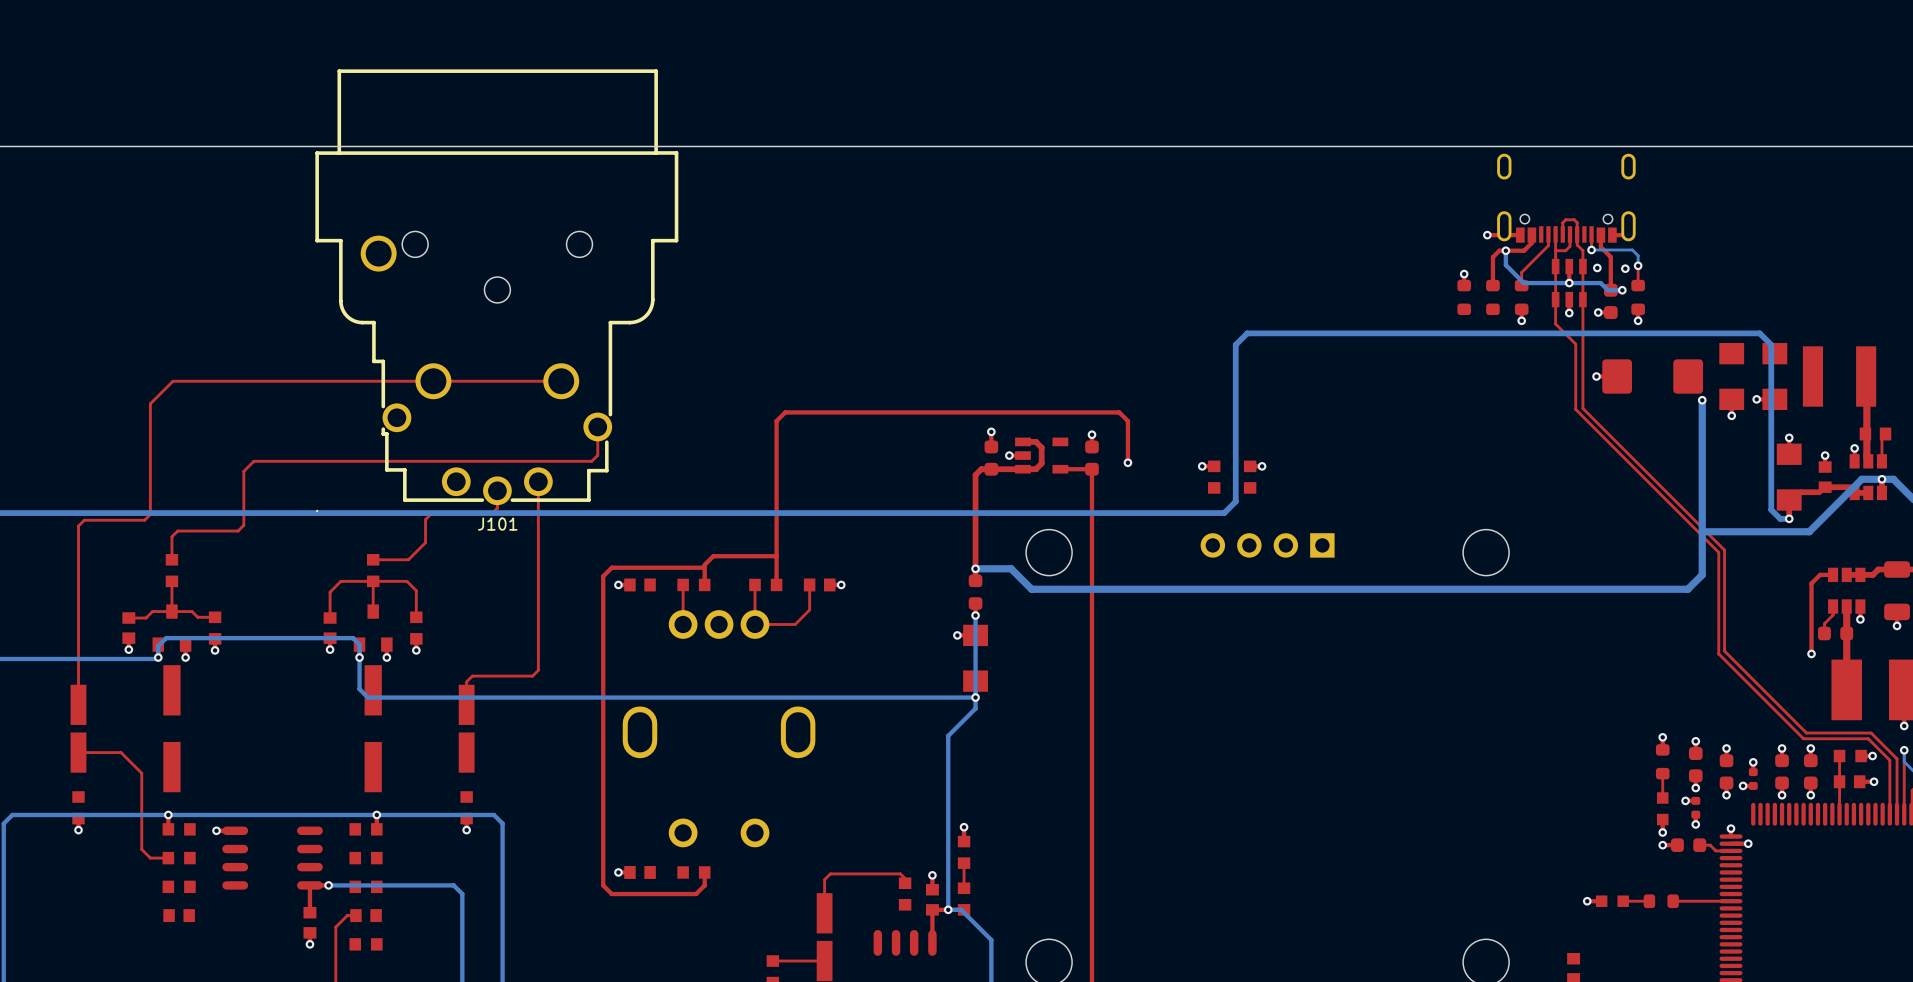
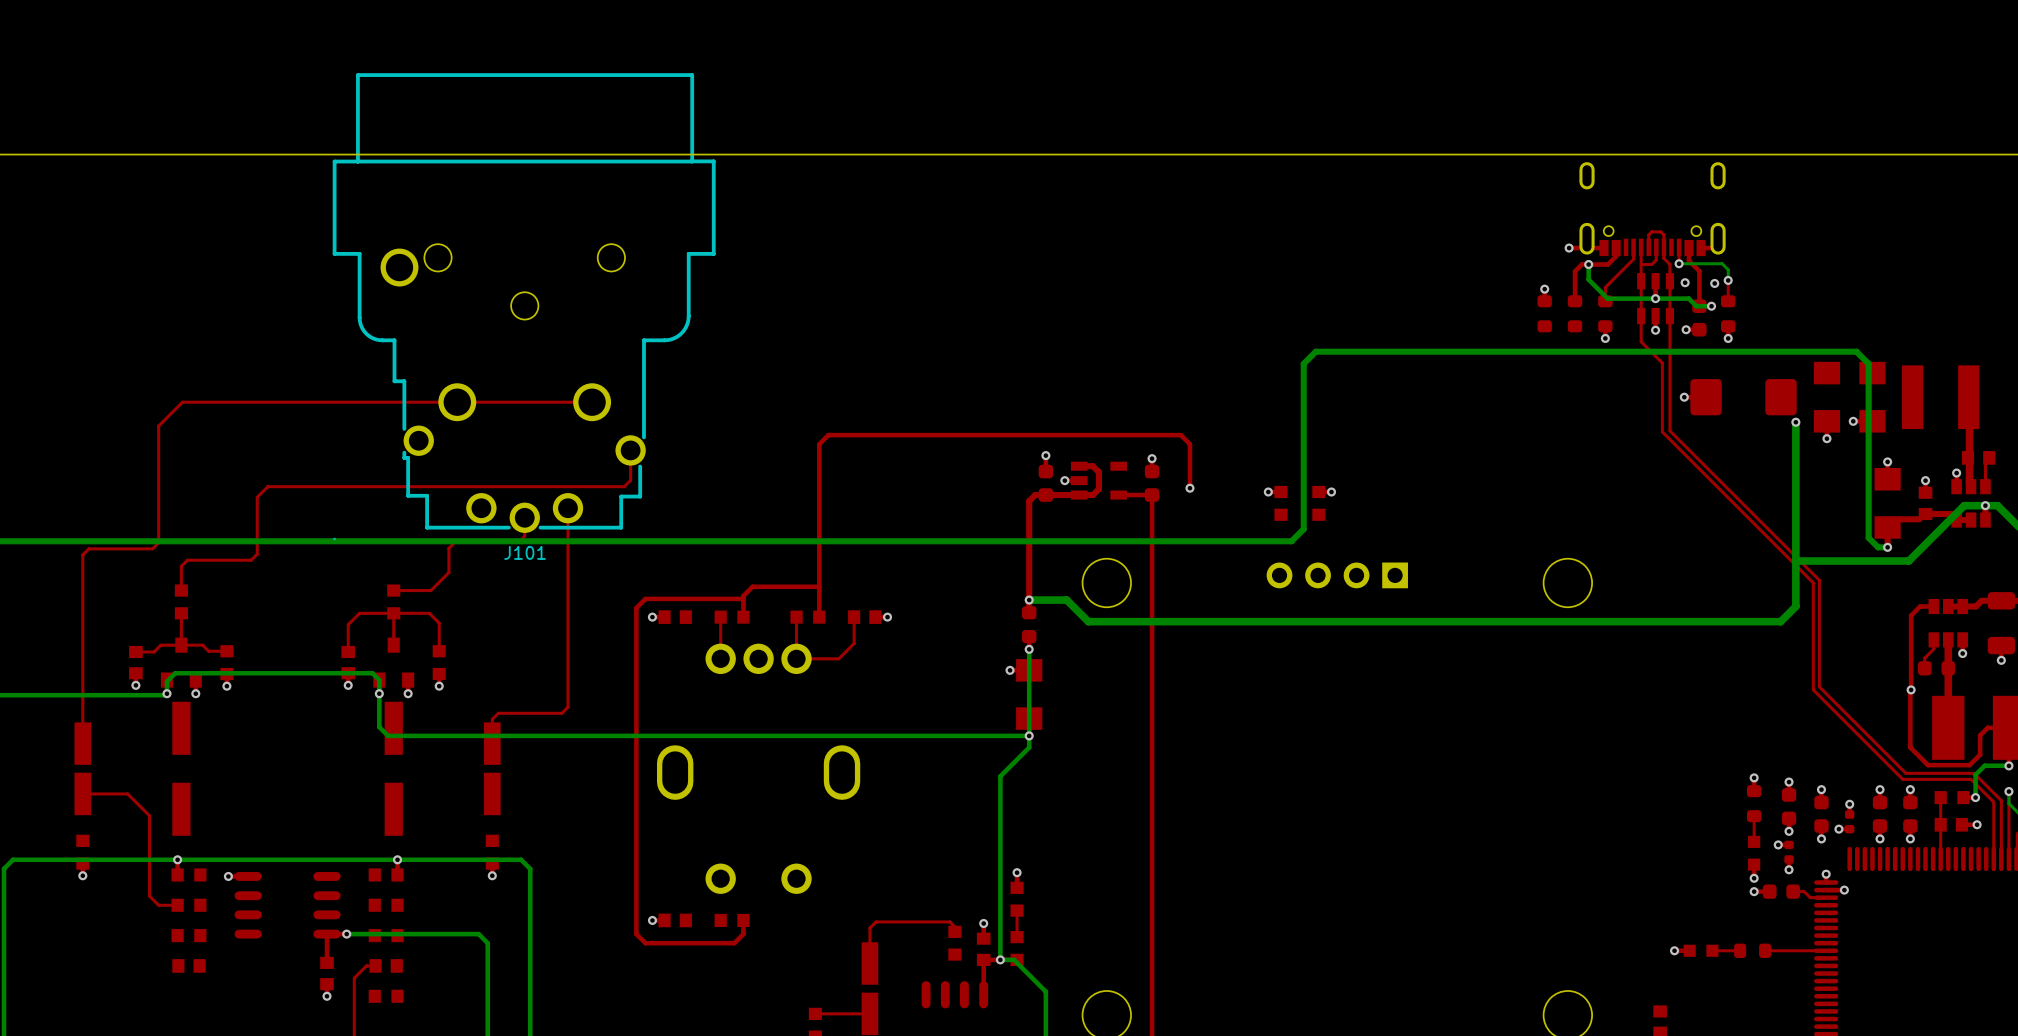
top track: none -> (1911, 689) (1910, 747) (1927, 765) (1969, 765) (1980, 754) (1980, 735) (1987, 727) (2008, 727)
bottom track: none -> (2010, 765) (1984, 765) (1975, 774) (1975, 797)

